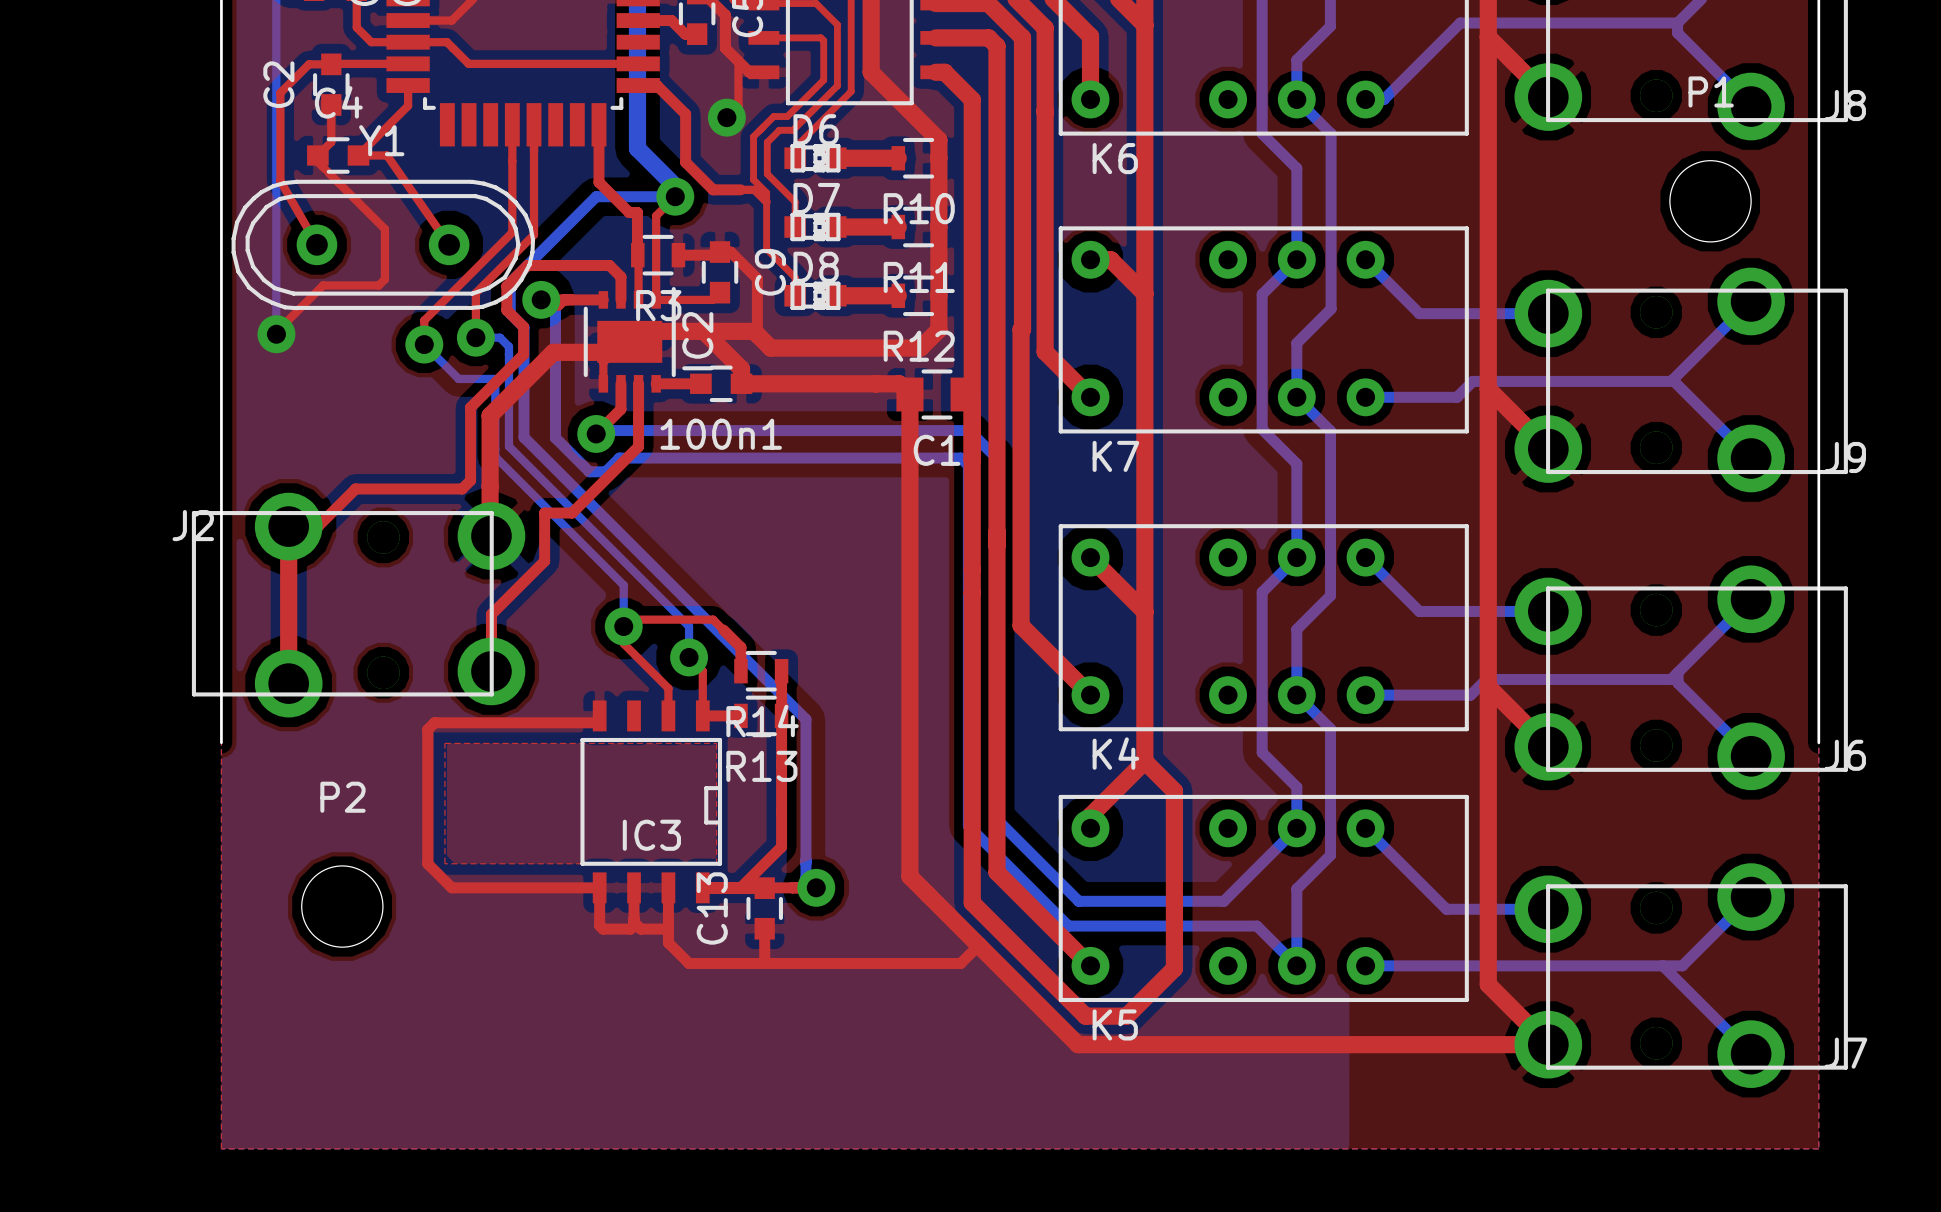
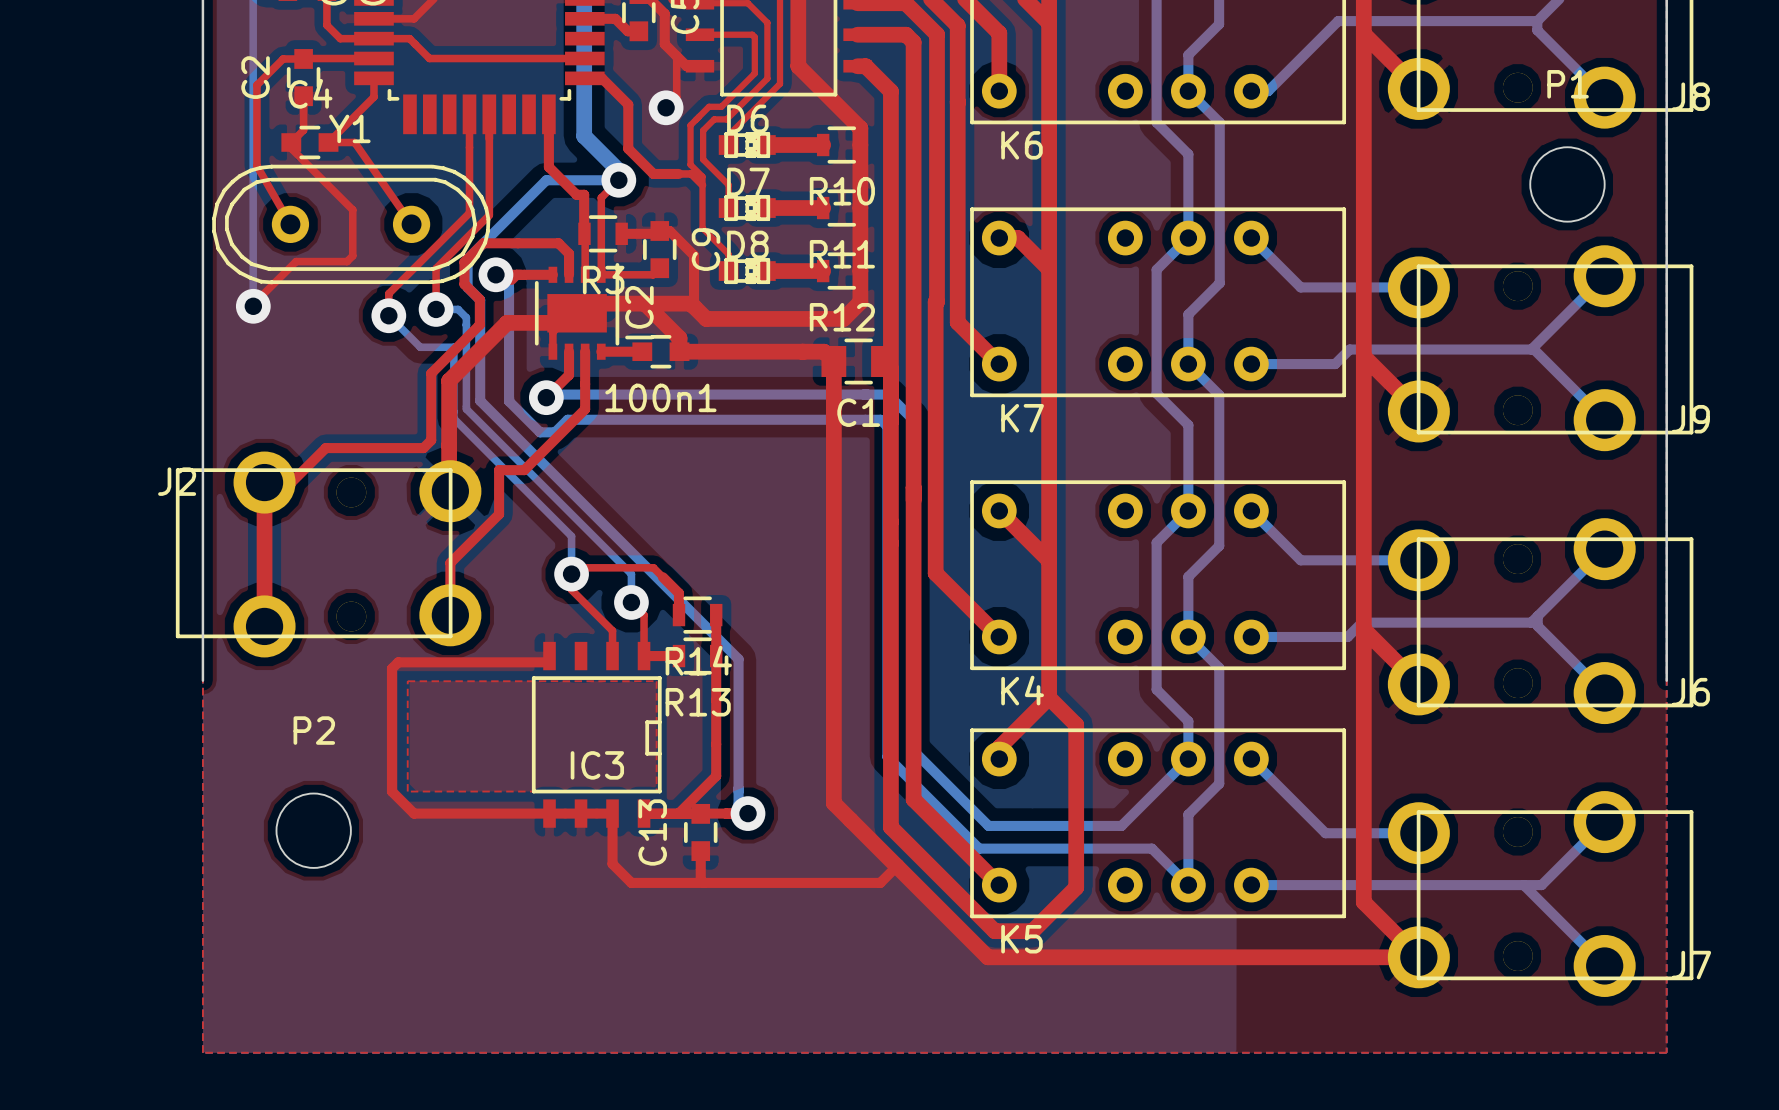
top track: (599, 887) (599, 925) (603, 929) (630, 929) (634, 925) (634, 887) -> (549, 813) (612, 813)
top track: (634, 922) (640, 929) (668, 929) -> none

